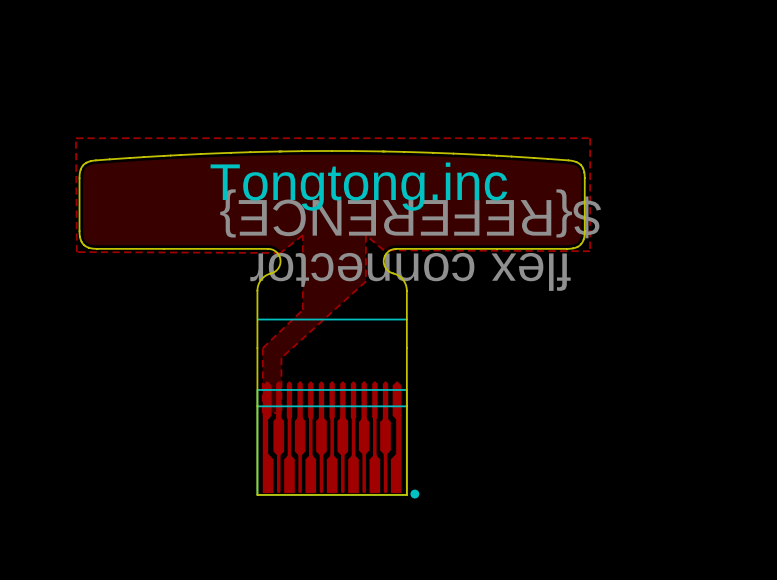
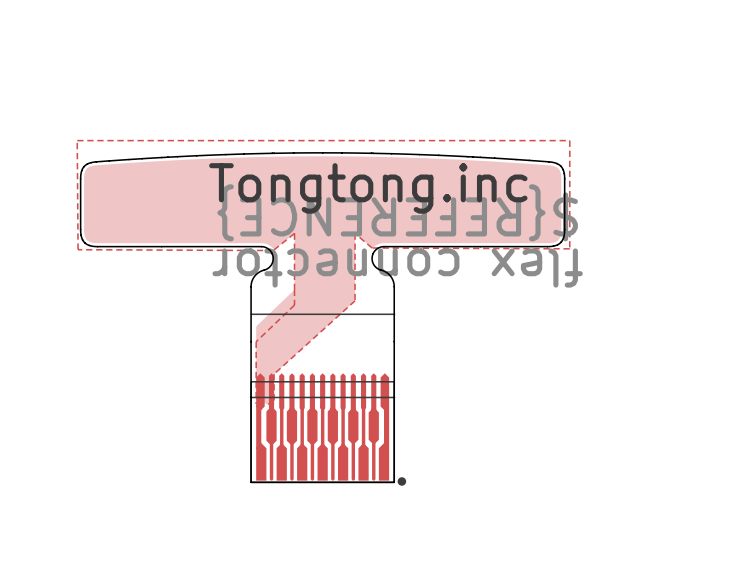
top zone outline: (365, 281) (281, 357) (281, 381) -> (355, 277) (355, 300) (274, 374)

